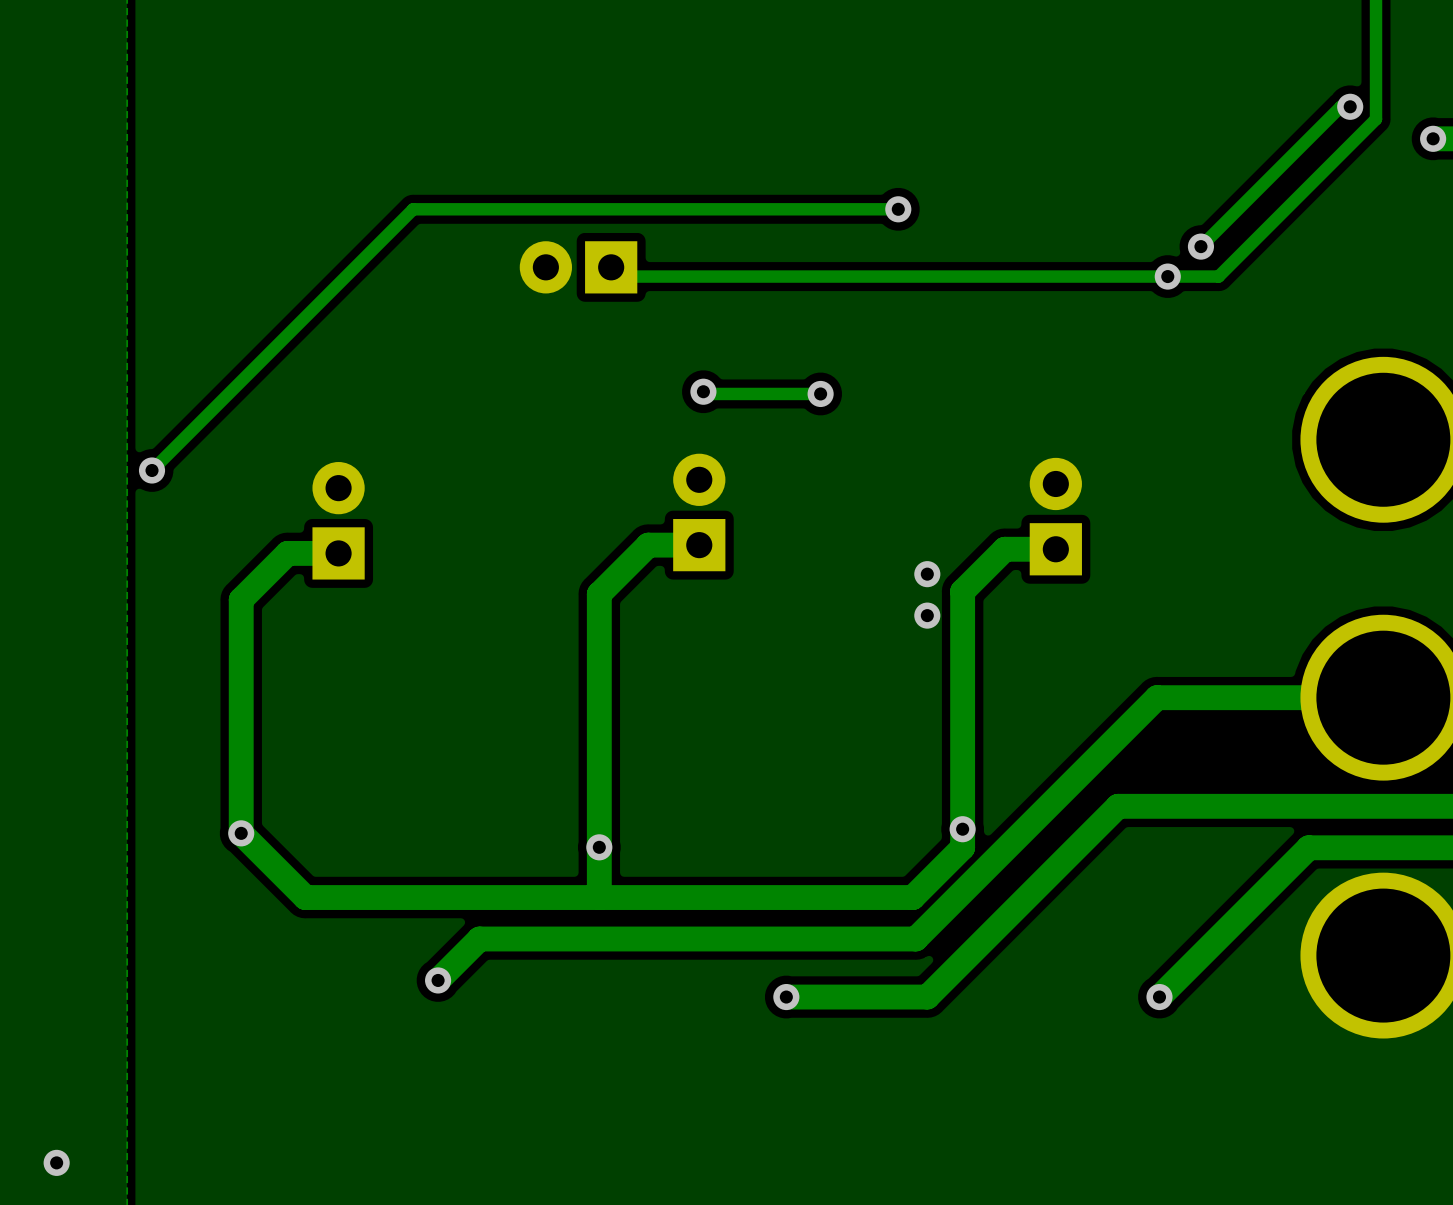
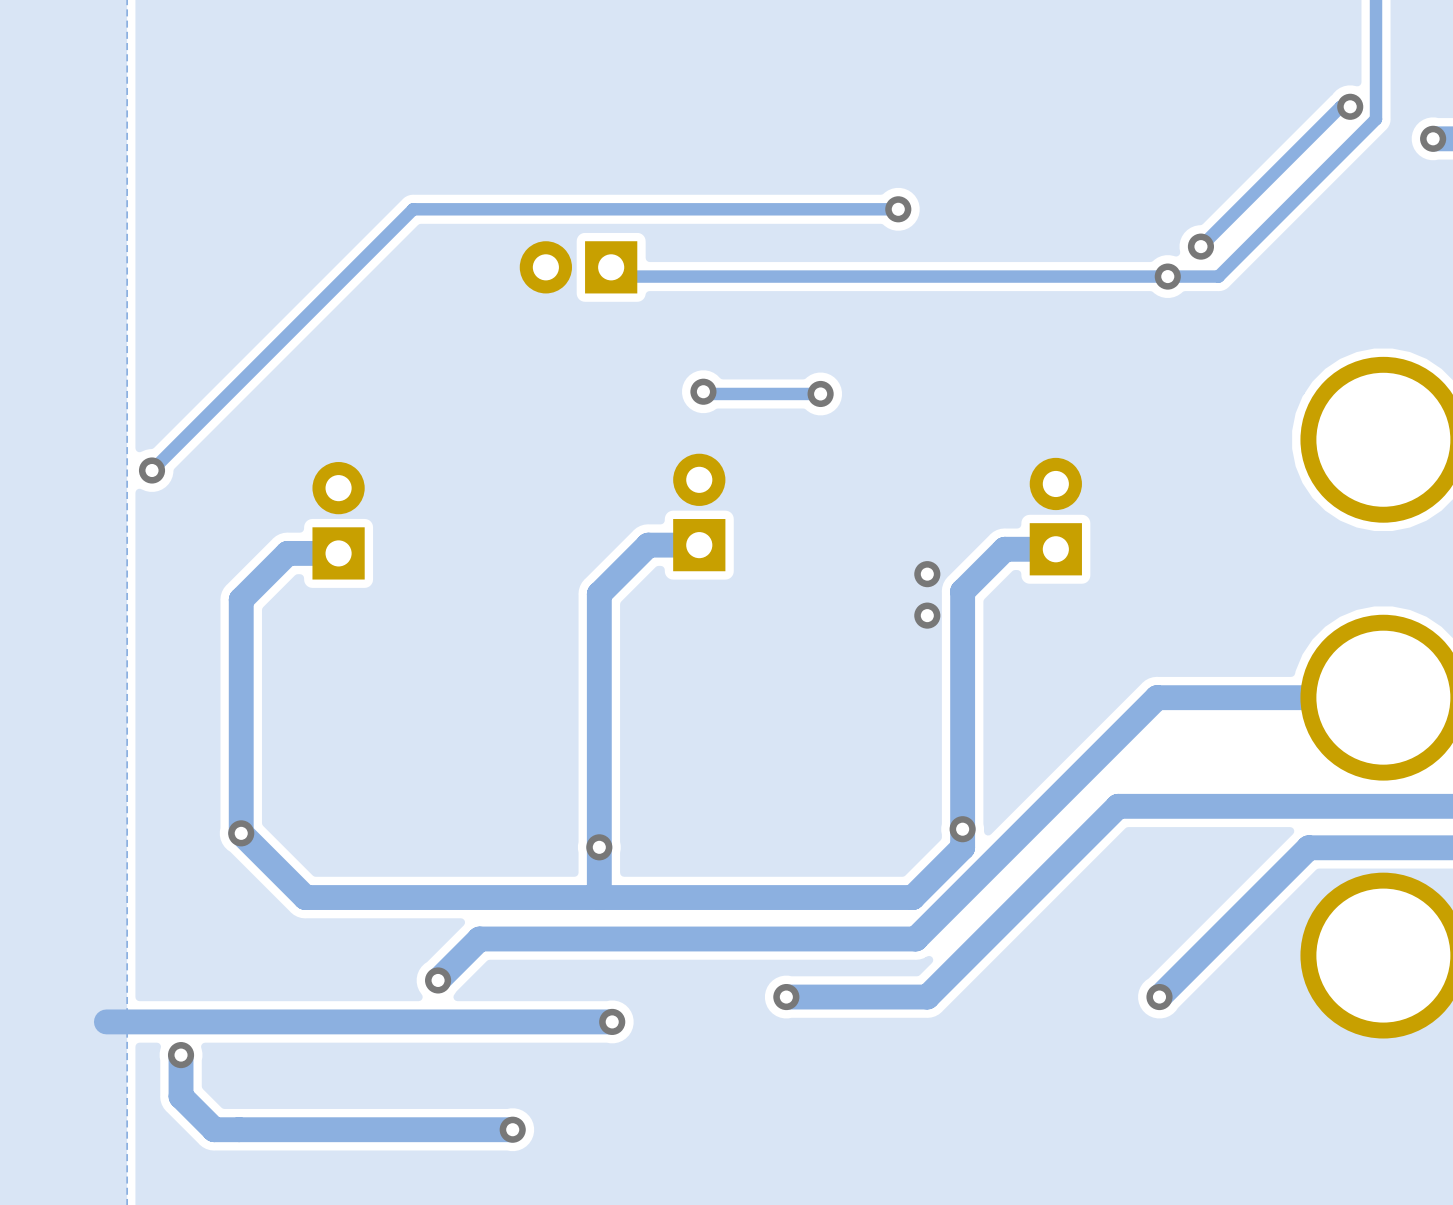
track: none -> (612, 1021) (106, 1021)
via: none -> (612, 1021)
track: none -> (181, 1055) (181, 1096) (214, 1129) (512, 1129)
via: none -> (512, 1129)
via position: (56, 1162) -> (181, 1055)

